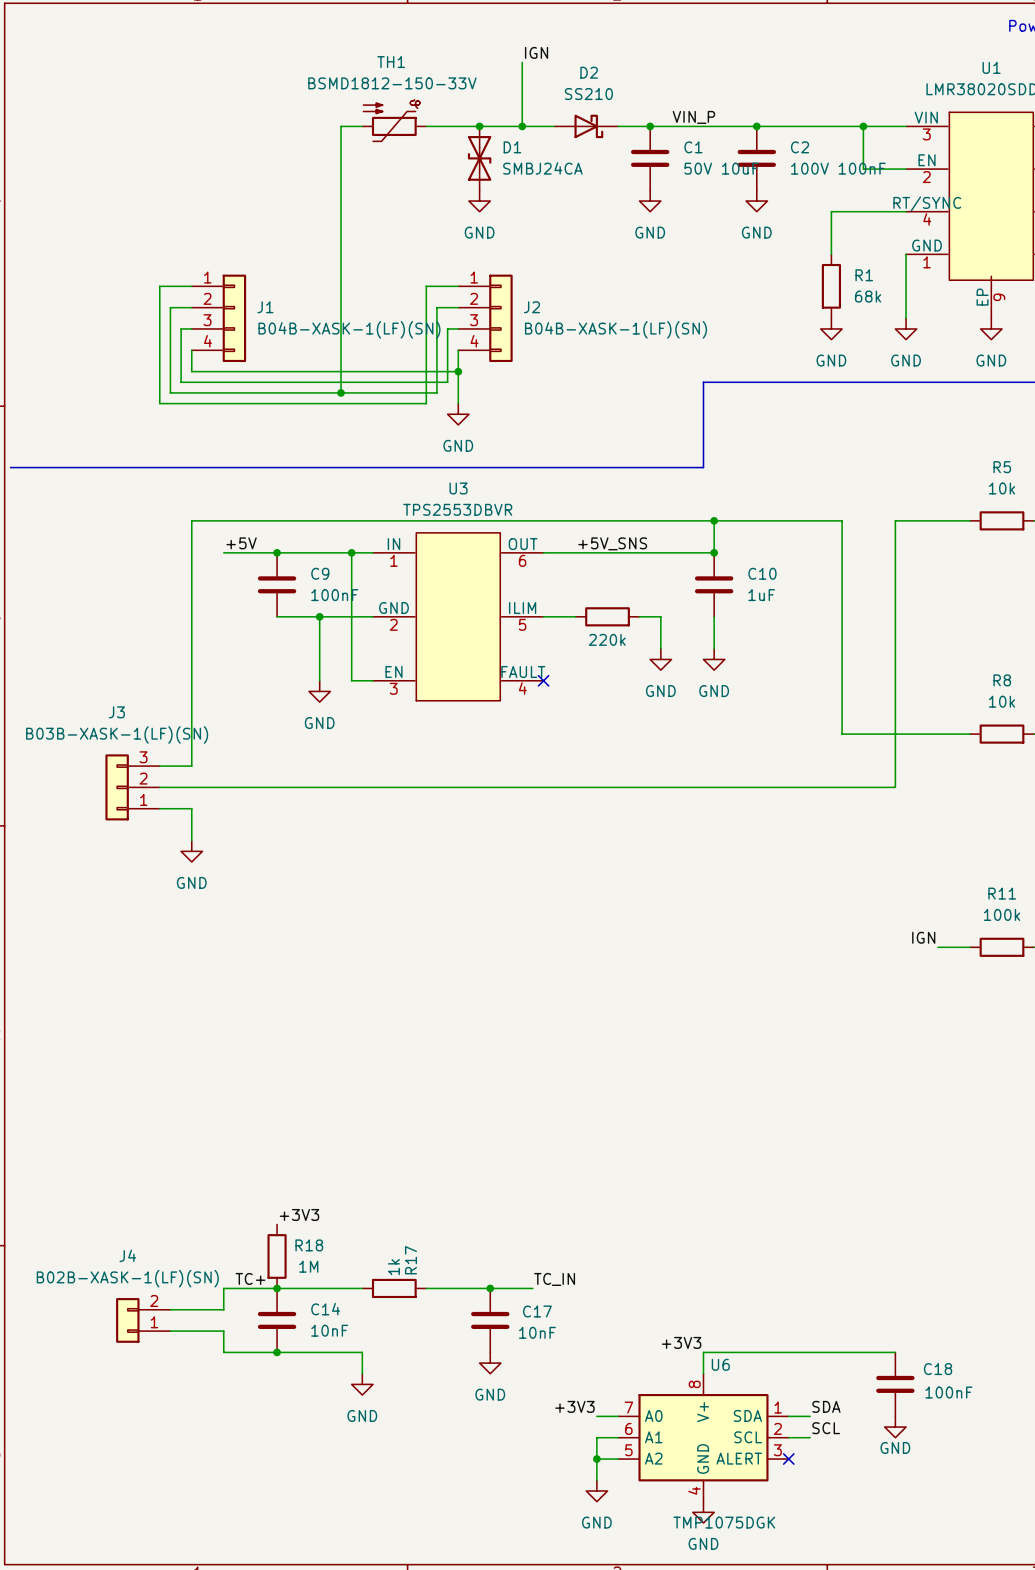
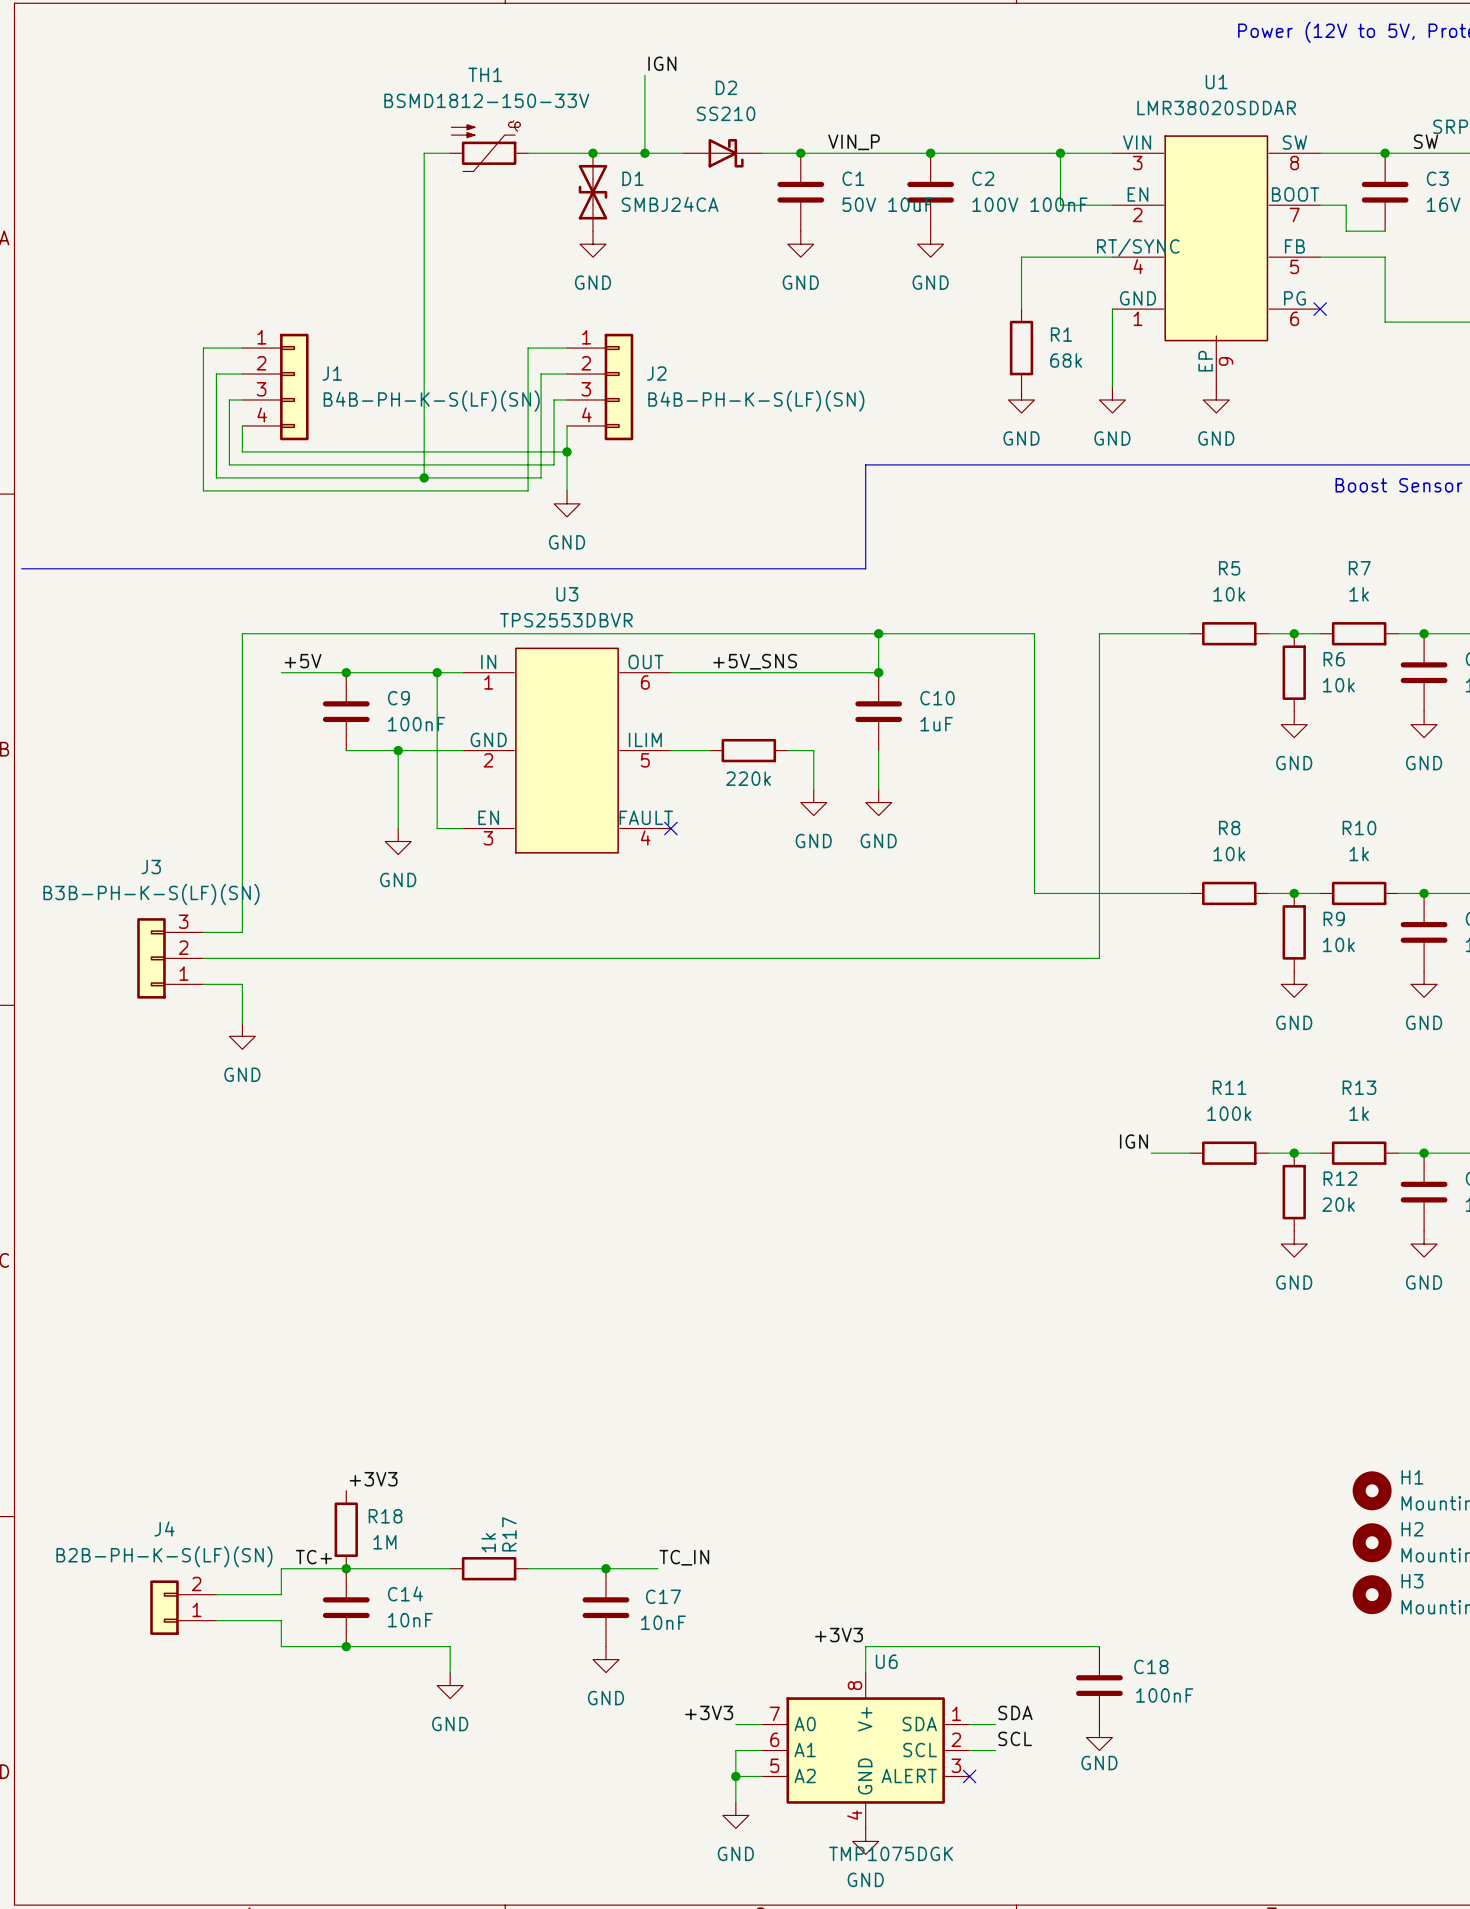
J1 value: B04B-XASK-1(LF)(SN) (349, 329) -> B4B-PH-K-S(LF)(SN) (431, 401)
J2 value: B04B-XASK-1(LF)(SN) (615, 329) -> B4B-PH-K-S(LF)(SN) (756, 401)
J3 value: B03B-XASK-1(LF)(SN) (117, 734) -> B3B-PH-K-S(LF)(SN) (151, 894)
J4 value: B02B-XASK-1(LF)(SN) (127, 1278) -> B2B-PH-K-S(LF)(SN) (164, 1556)

